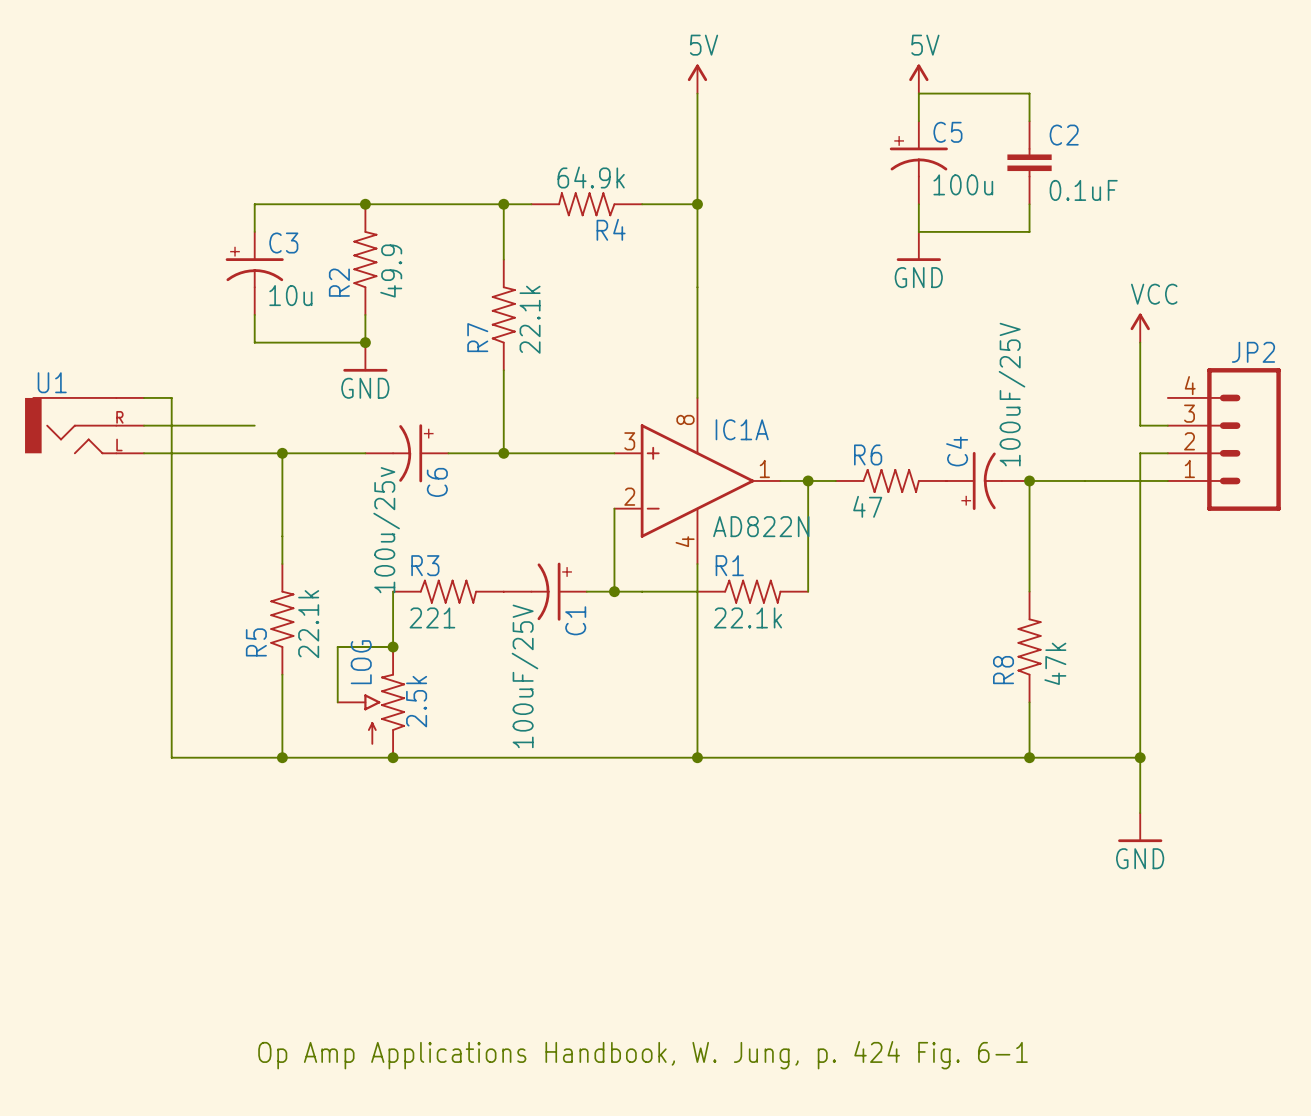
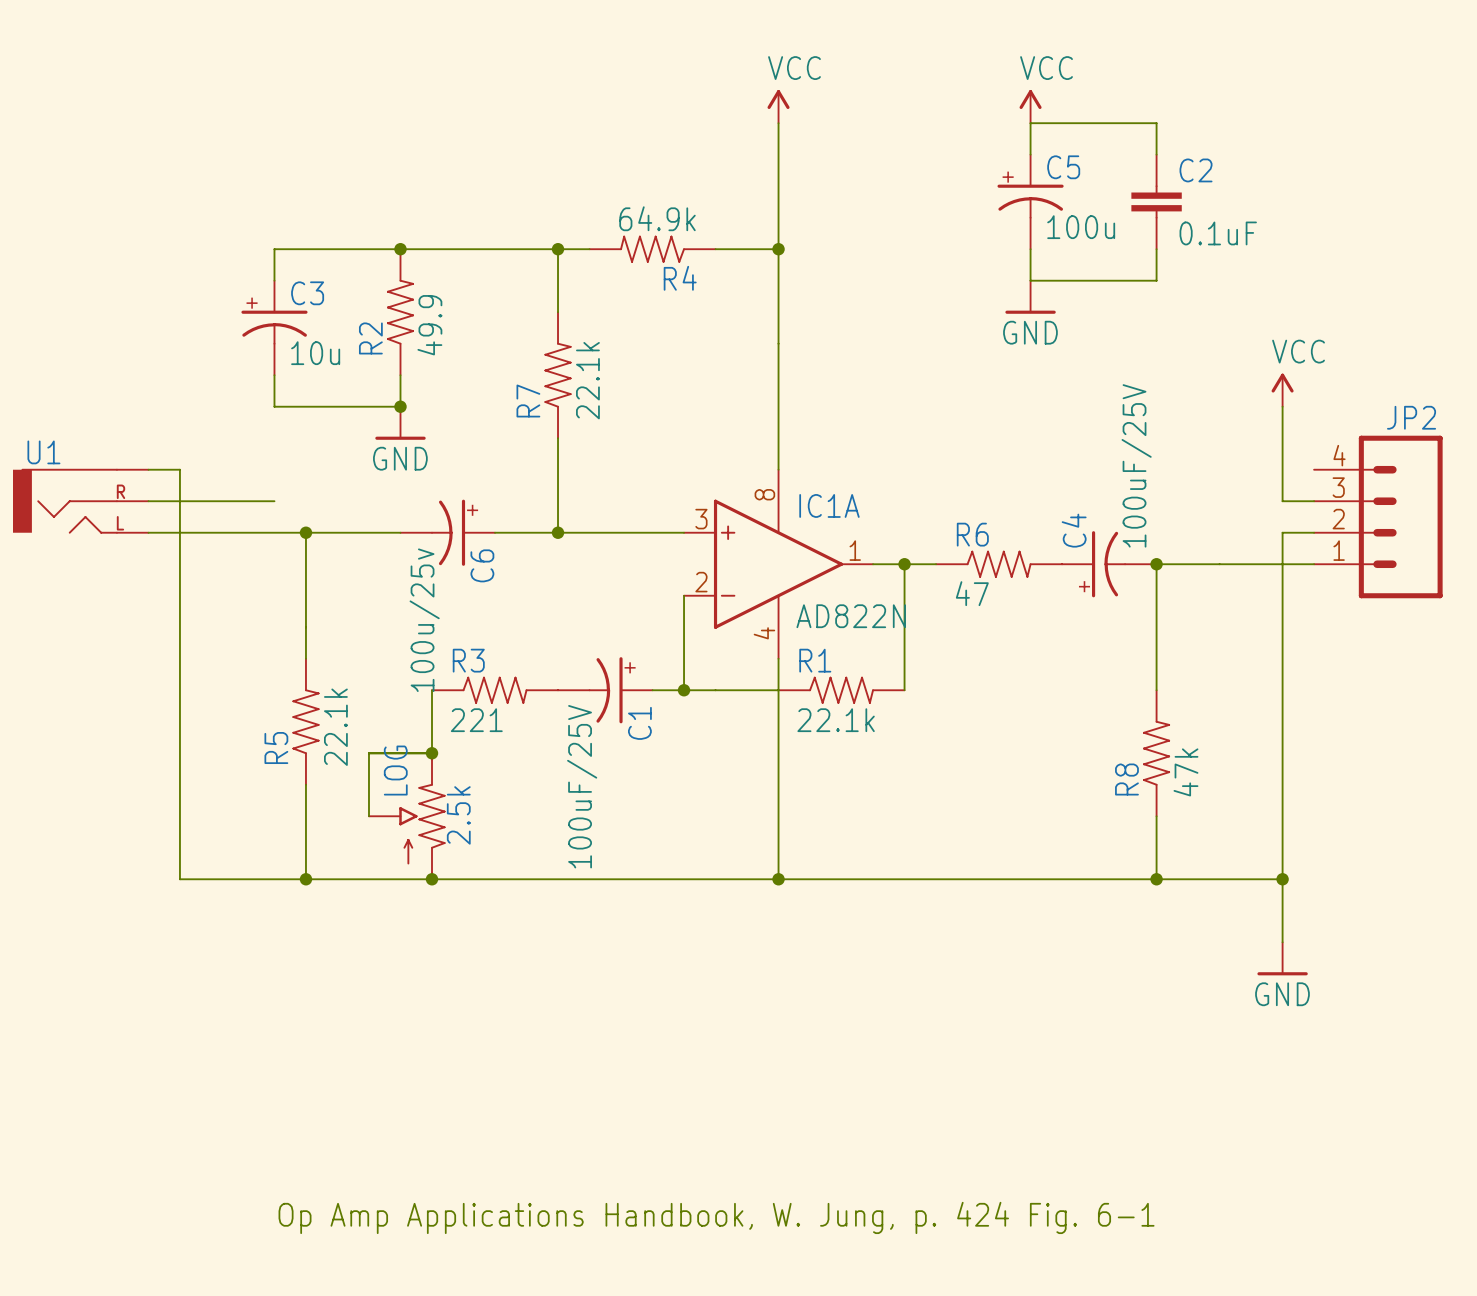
power symbol: 5V (697, 79) -> VCC (778, 106)
power symbol: 5V (918, 79) -> VCC (1030, 106)

